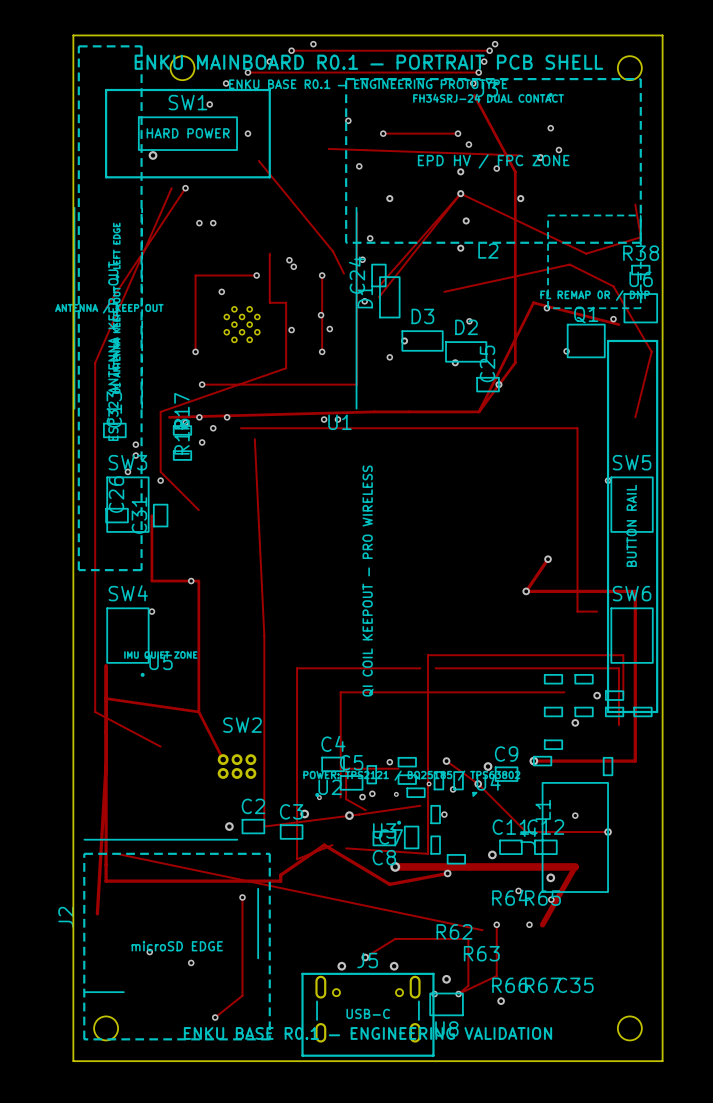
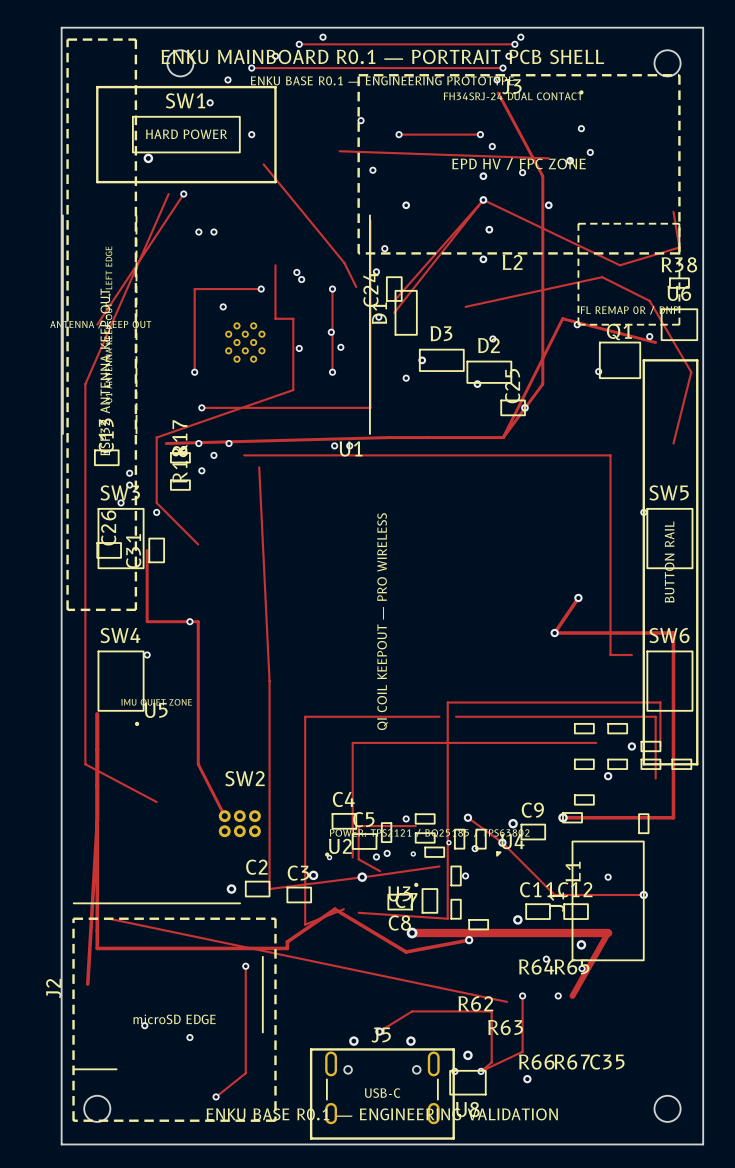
track: (106, 698) (198, 711) -> none

